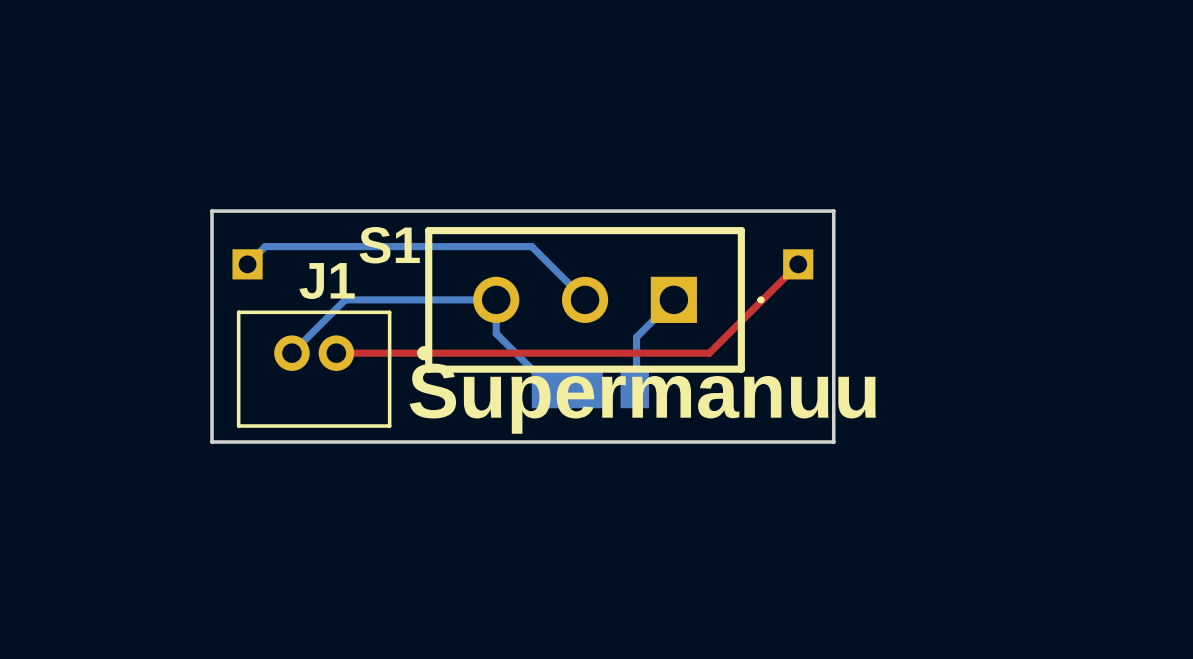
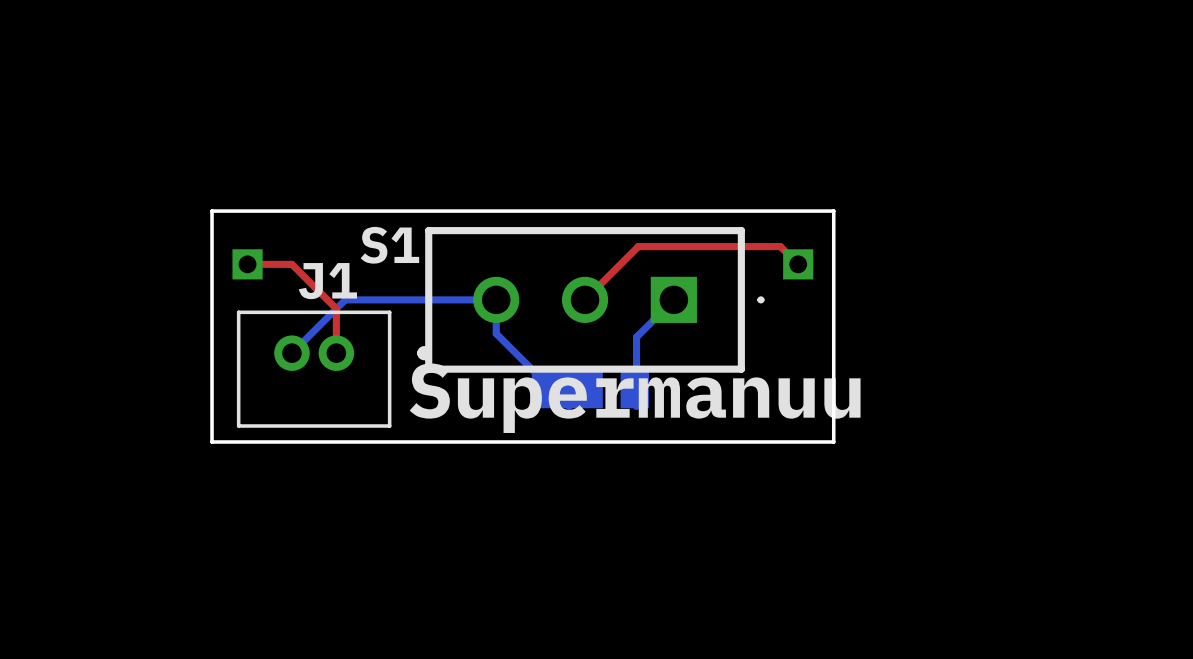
bottom track: (247, 264) (265, 246) (531, 246) (585, 299) -> none
top track: none -> (247, 264) (291, 264) (336, 308) (336, 353)
top track: (798, 264) (709, 353) (336, 353) -> (798, 264) (780, 246) (638, 246) (585, 299)

